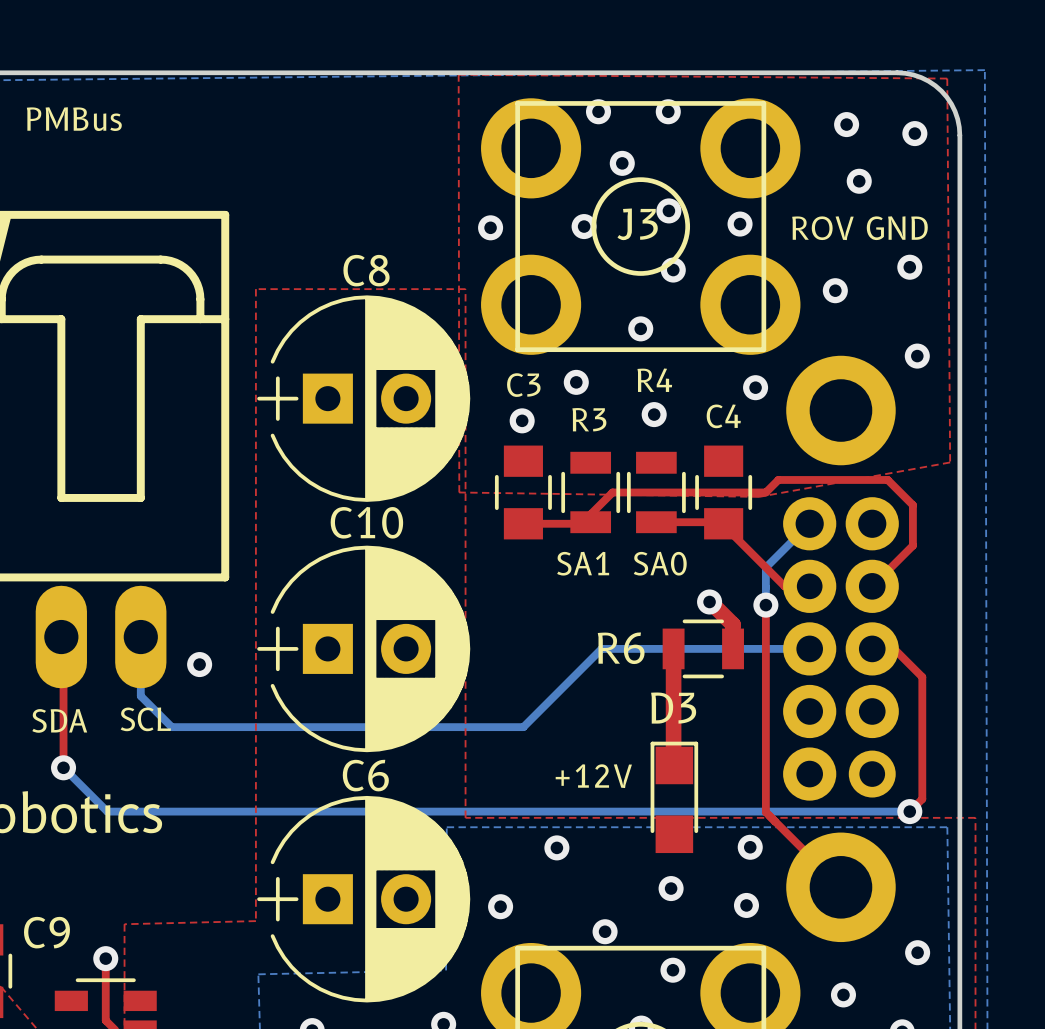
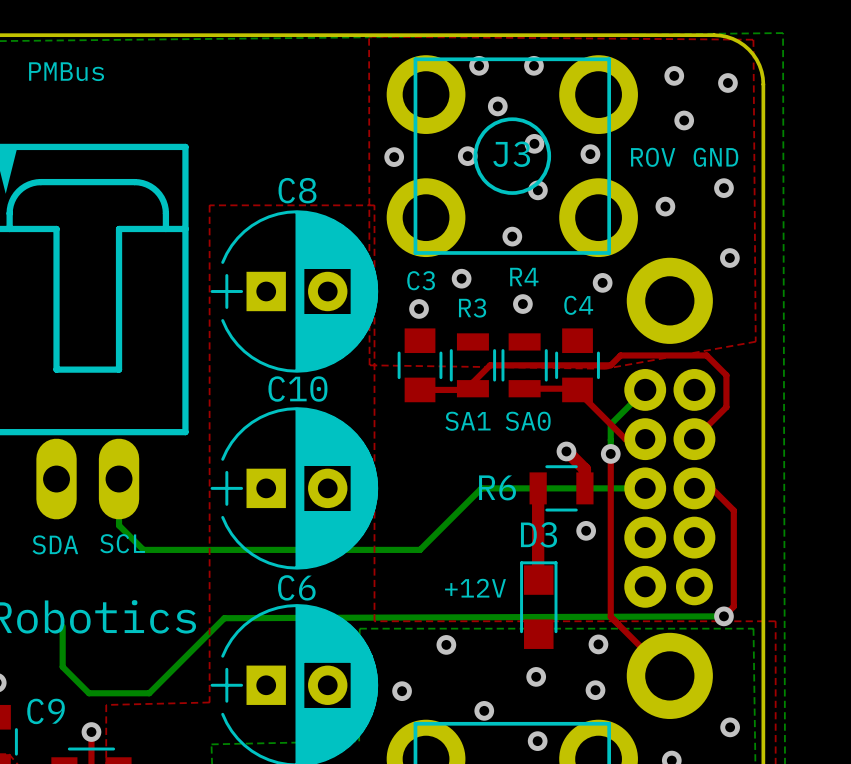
top track: (61, 637) (63, 639) (63, 767) -> none
via: (199, 664) -> none
via: none -> (586, 530)
bottom track: (63, 767) (107, 811) (909, 811) -> (62, 626) (62, 666) (89, 693) (149, 693) (224, 618) (723, 616)
via: (63, 767) -> none

